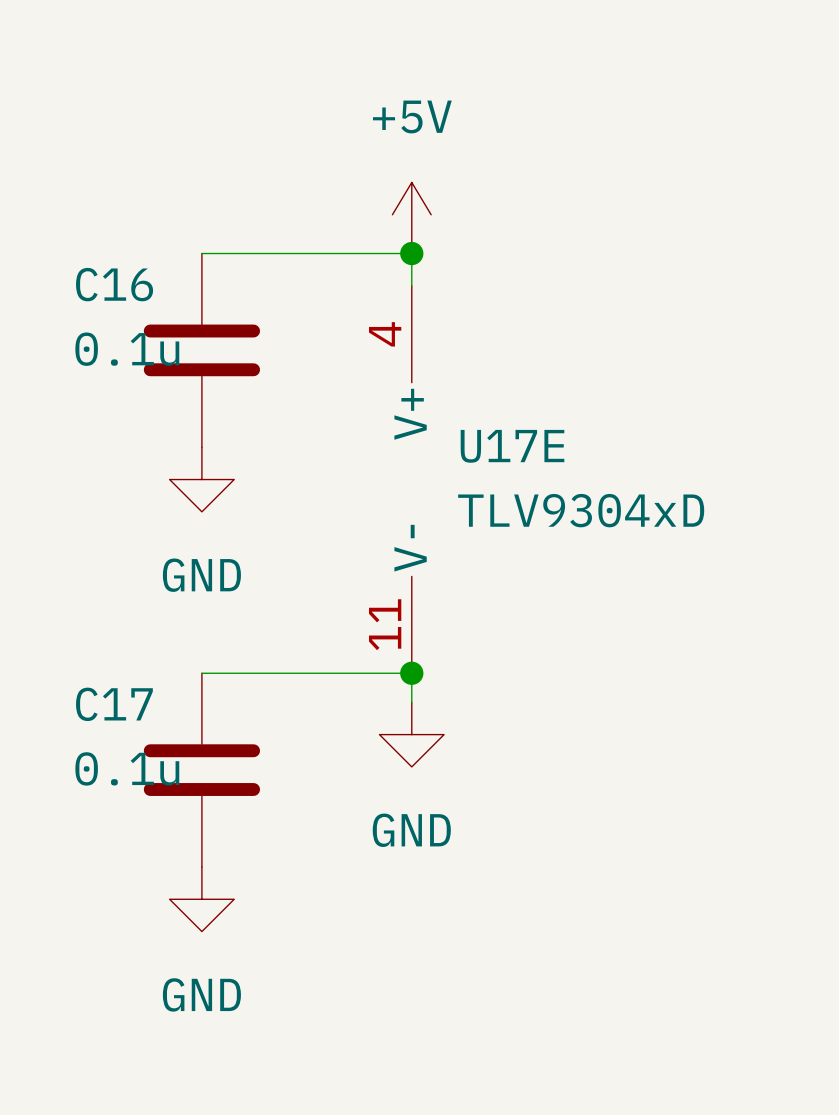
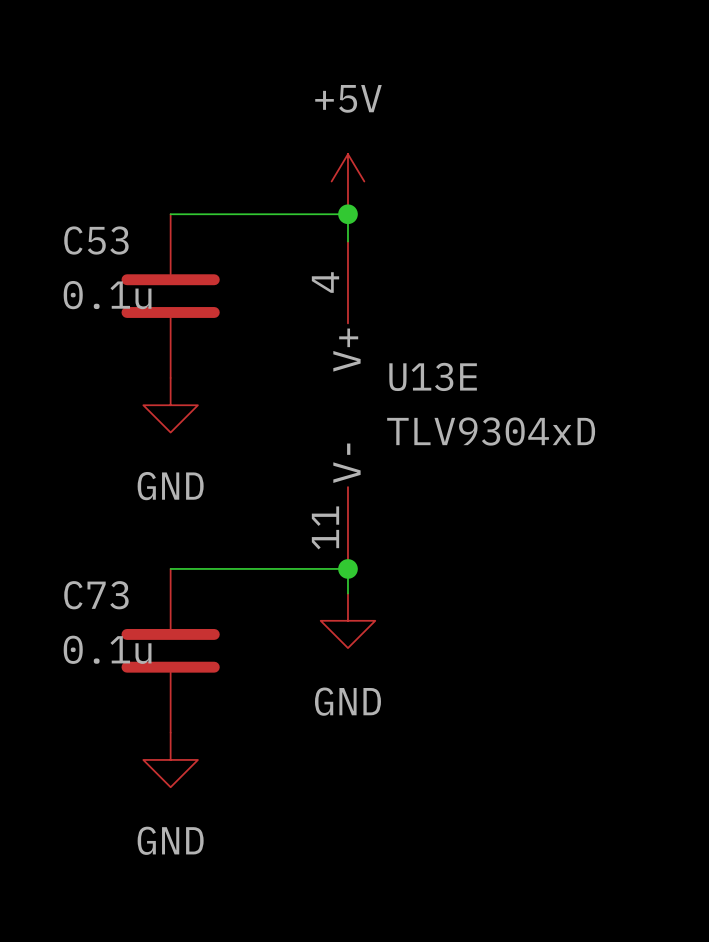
C16 name: C16 (114, 284) -> C53 (96, 240)
U17E name: U17E (512, 446) -> U13E (433, 376)
C17 name: C17 (114, 704) -> C73 (96, 595)

